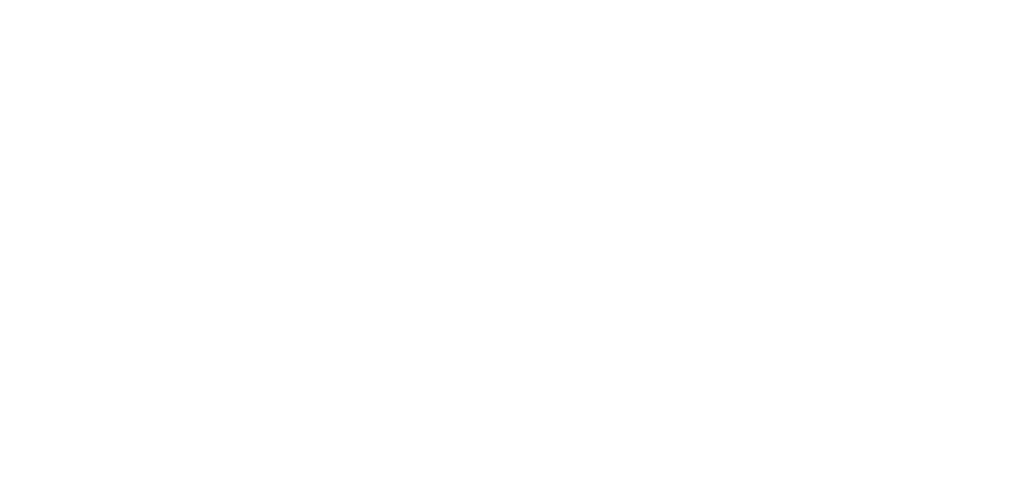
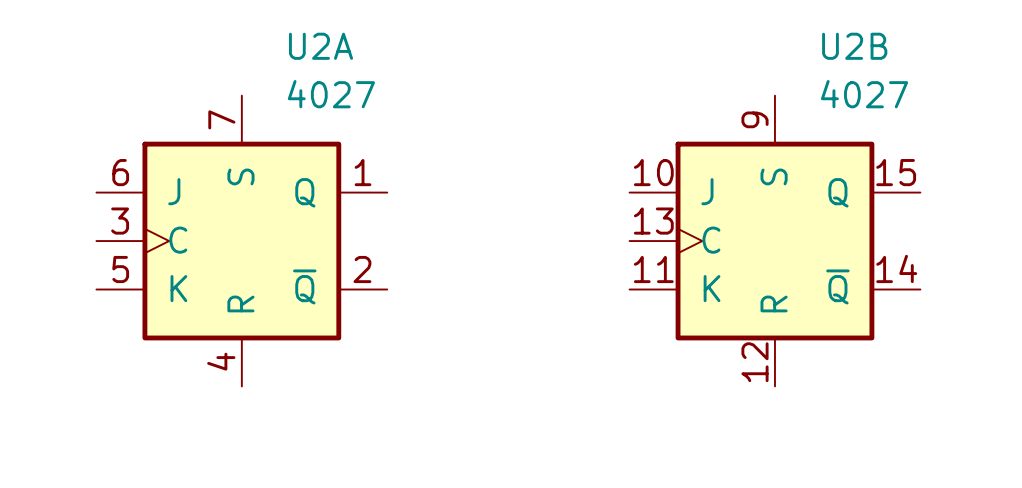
U2A: none -> 4027 (241, 241)
U2B: none -> 4027 (774, 241)

